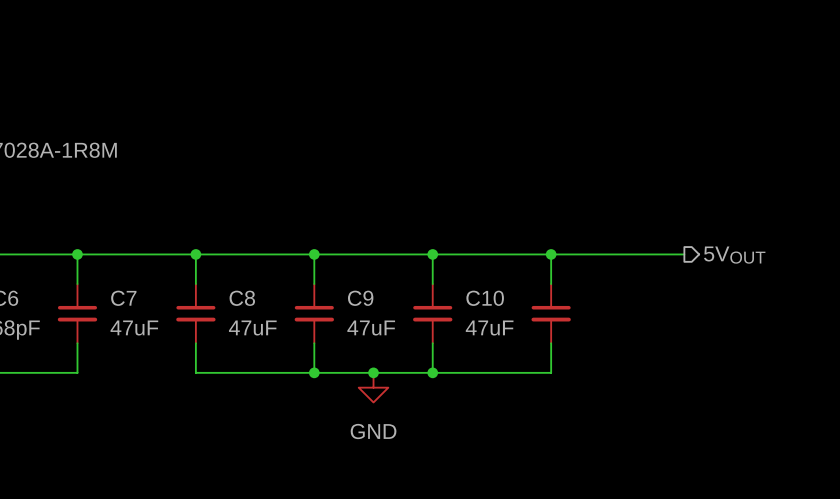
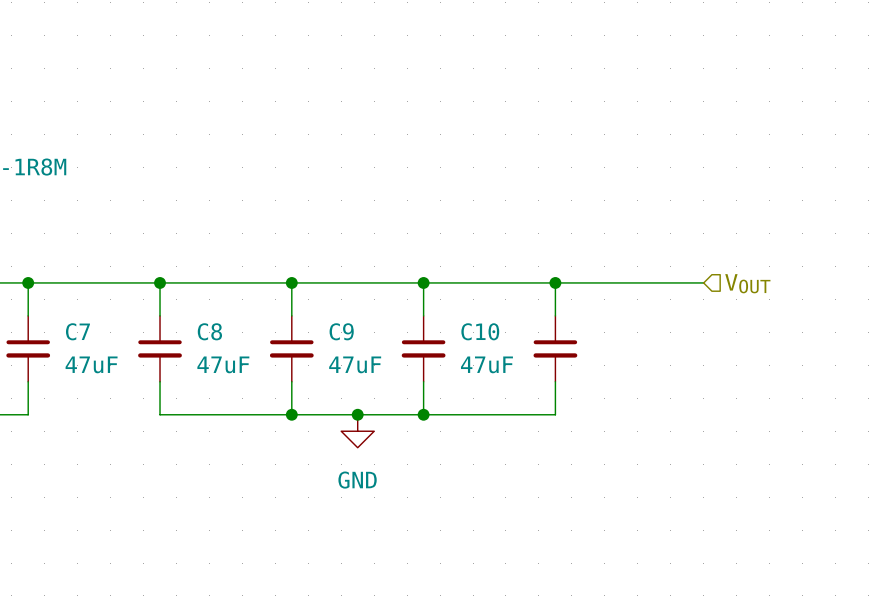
hierarchical label shape: output (734, 255) -> input (747, 283)
hierarchical label: 5VOUT (734, 255) -> VOUT (747, 283)

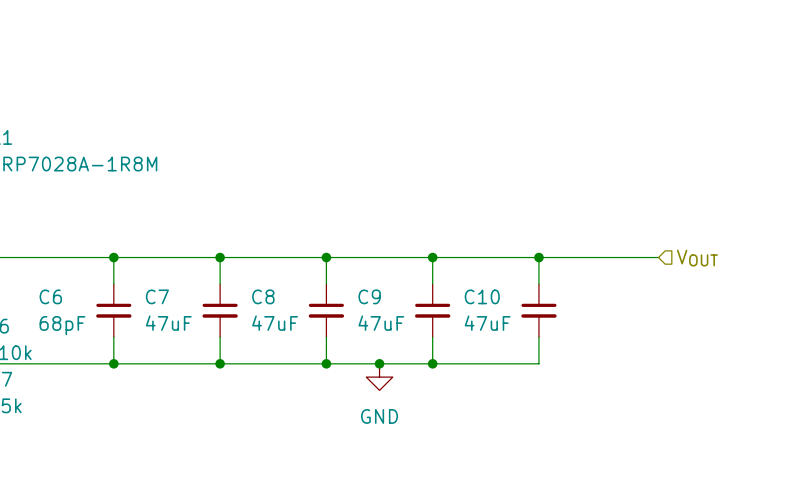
wire: none -> (113, 363) (220, 363)
junction: none -> (113, 363)
junction: none -> (220, 363)

